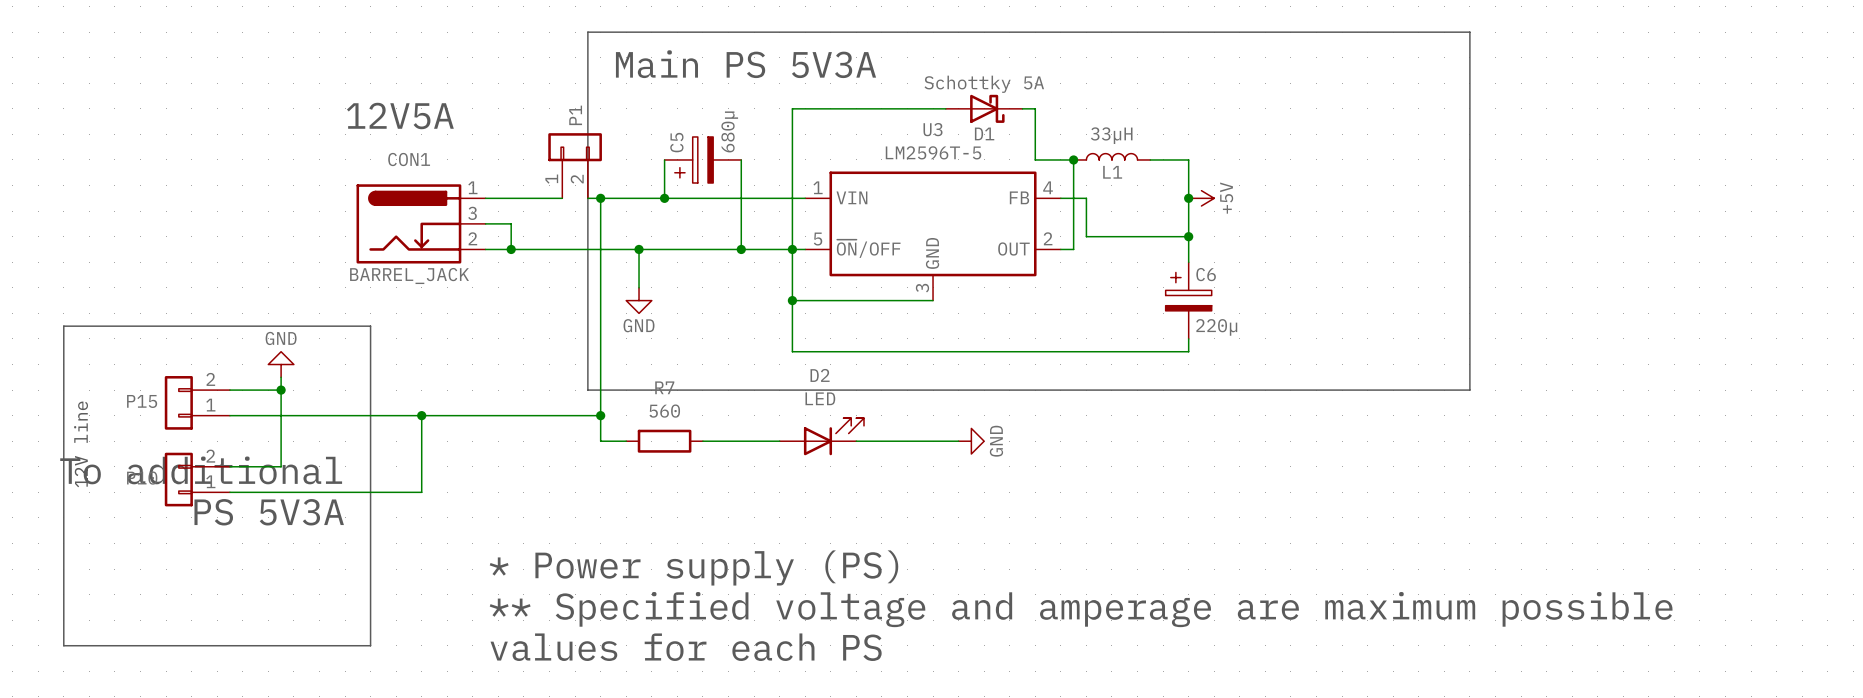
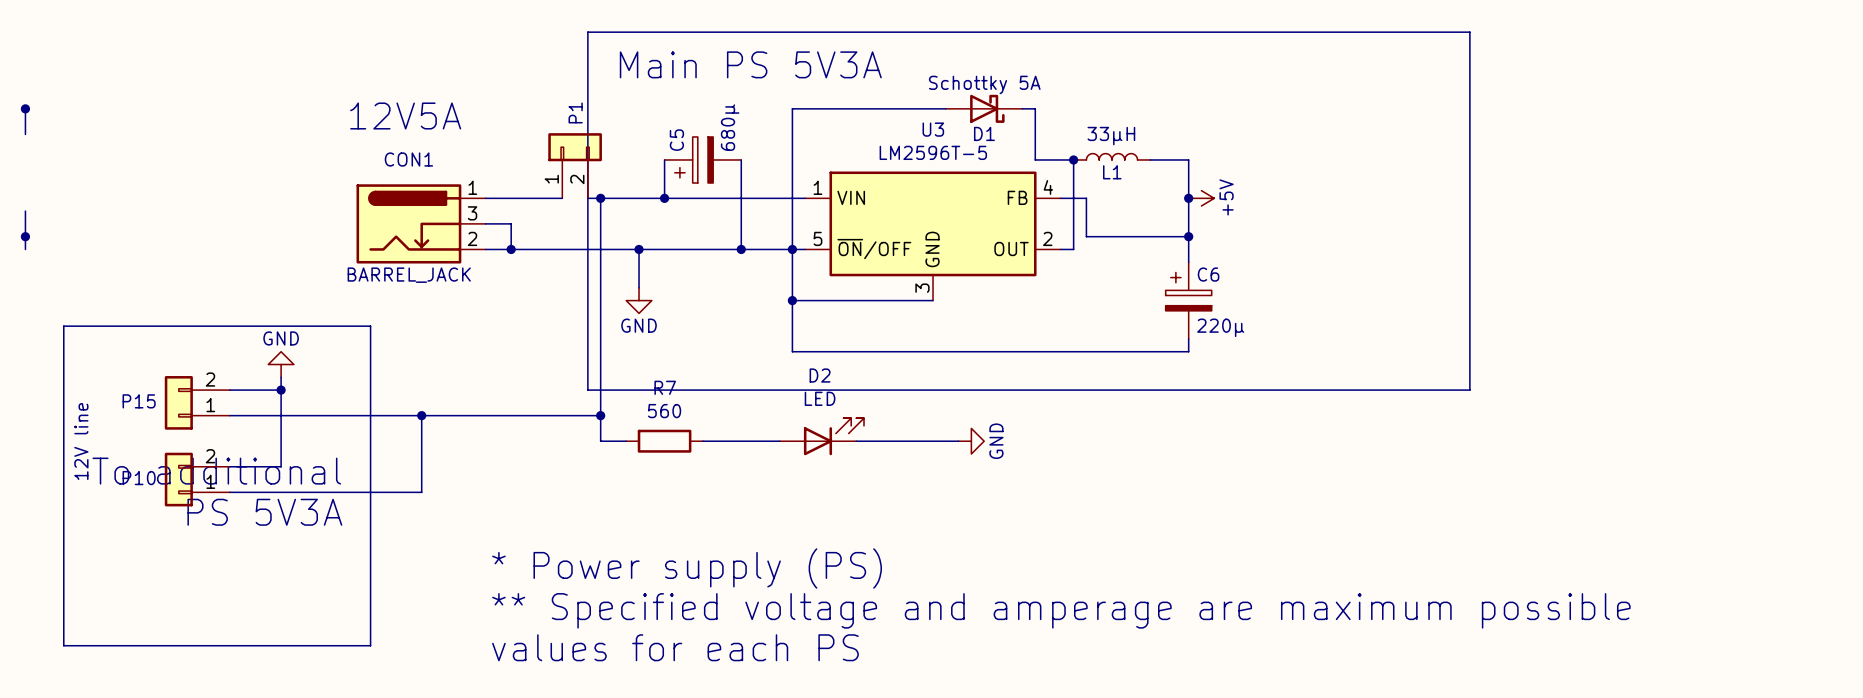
wire: none -> (25, 108) (25, 134)
junction: none -> (25, 108)
wire: none -> (25, 211) (25, 249)
junction: none -> (25, 236)

